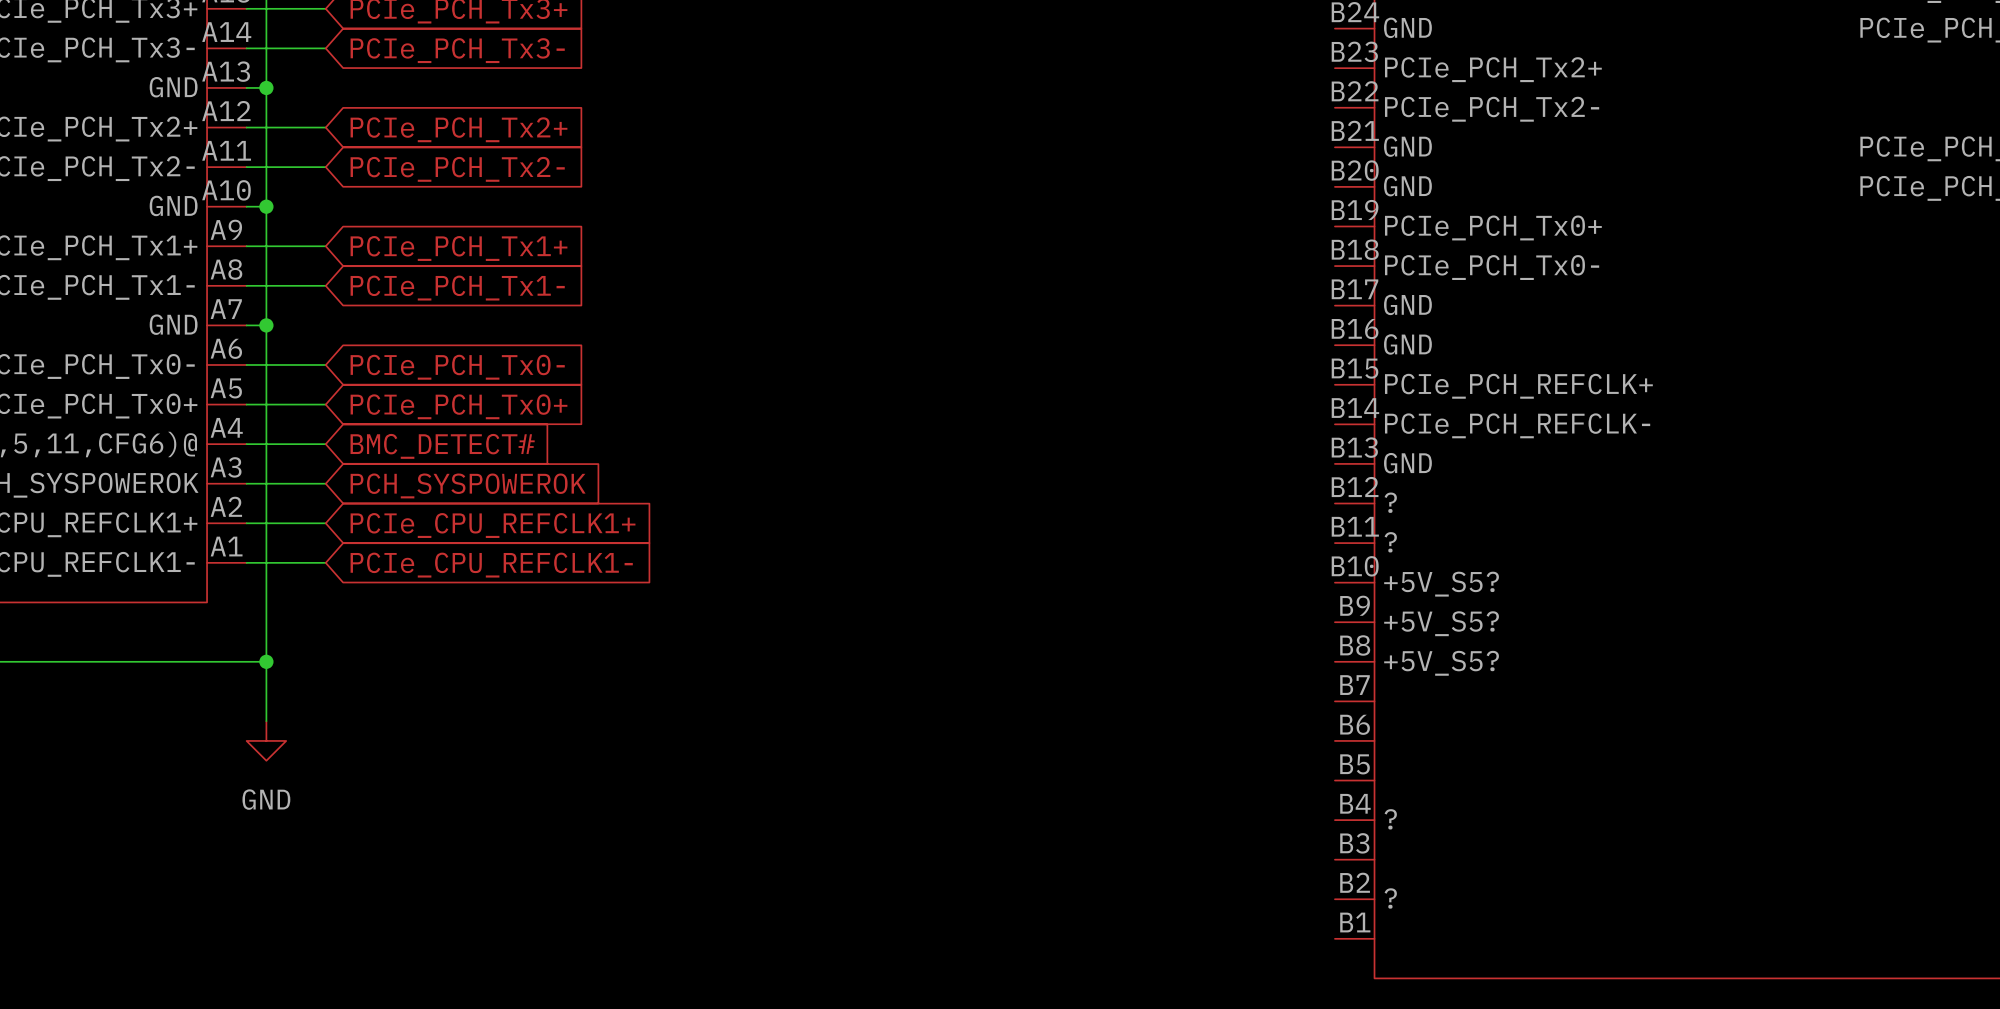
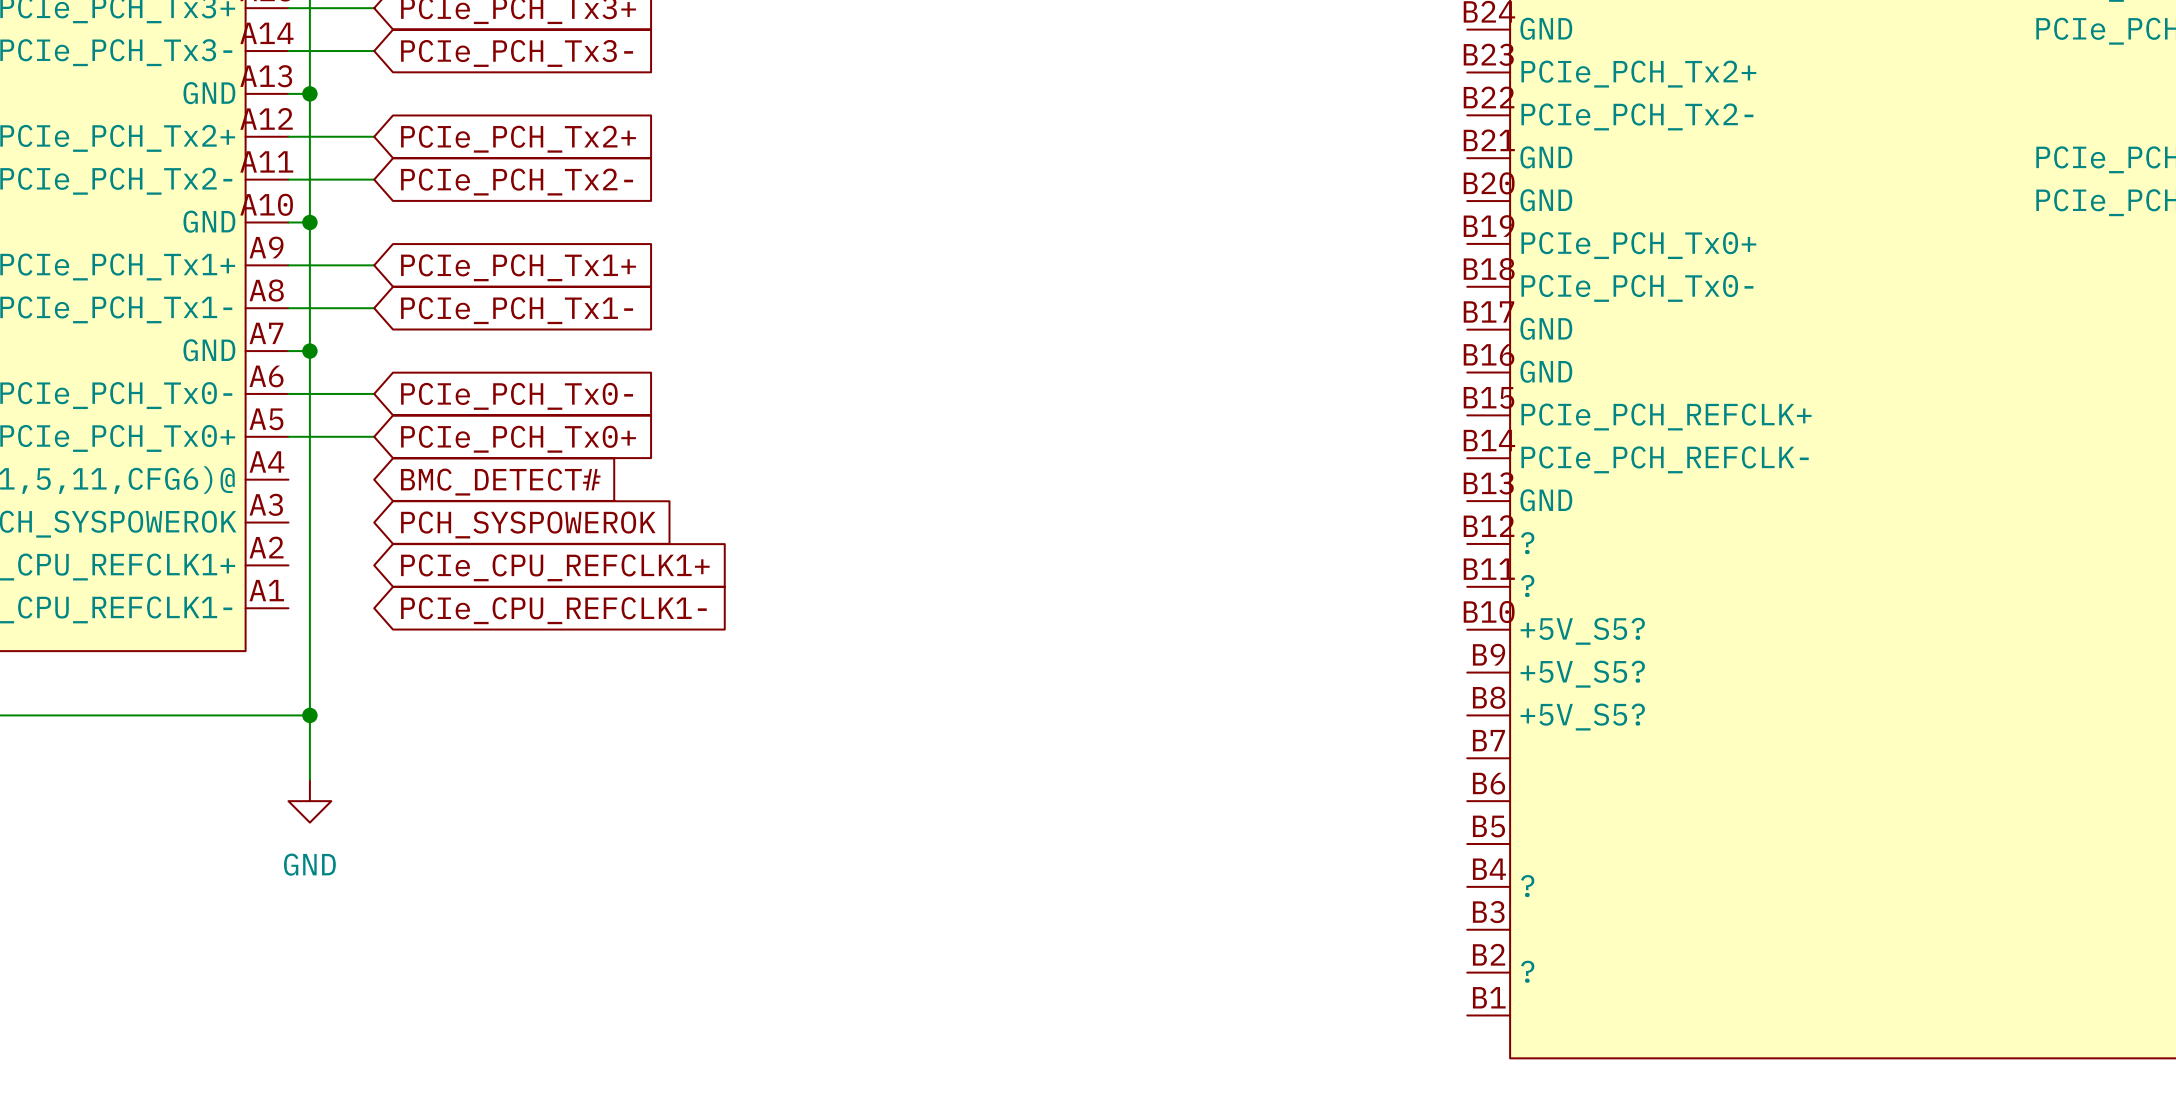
wire: (246, 444) (325, 444) -> none
wire: (246, 483) (325, 483) -> none
wire: (246, 523) (325, 523) -> none
wire: (246, 562) (325, 562) -> none

